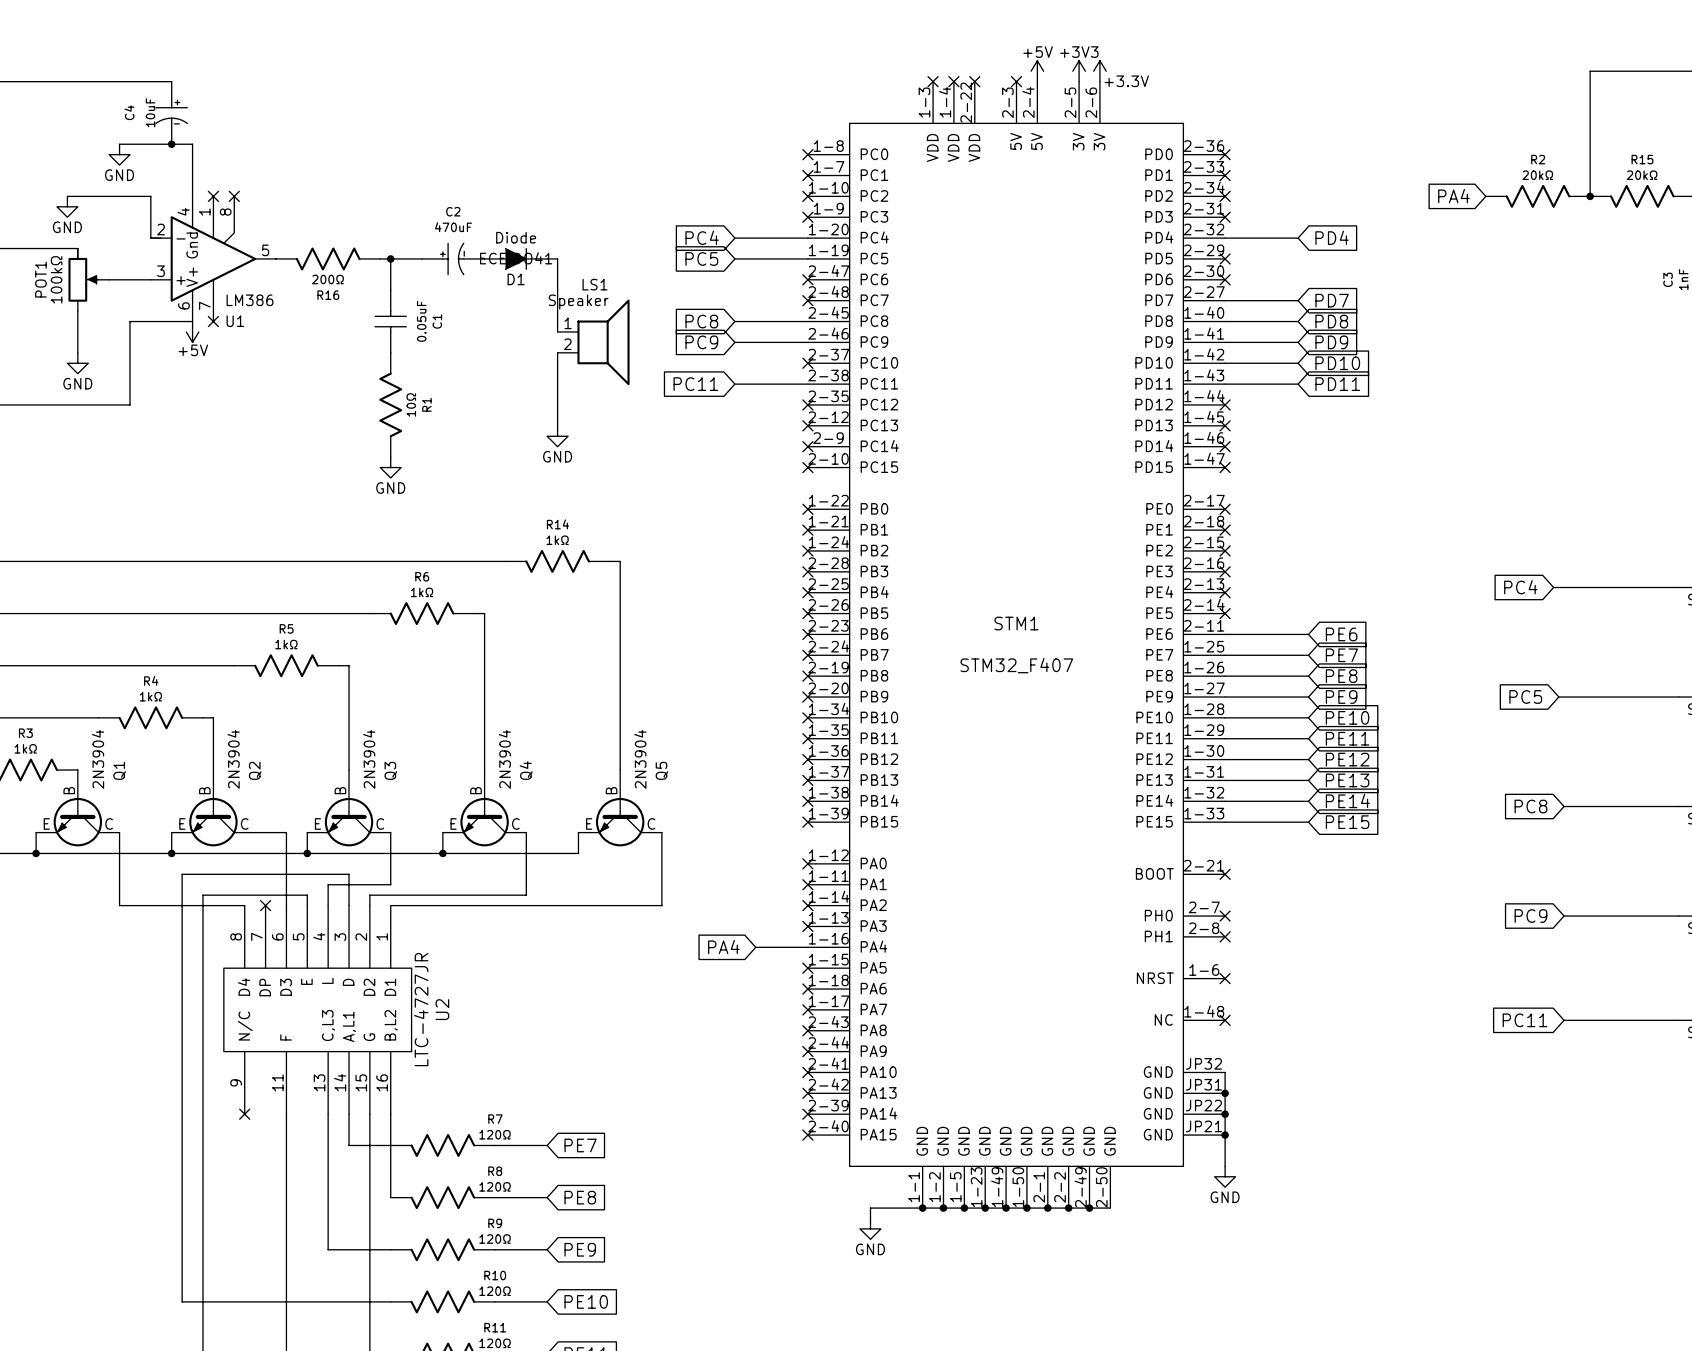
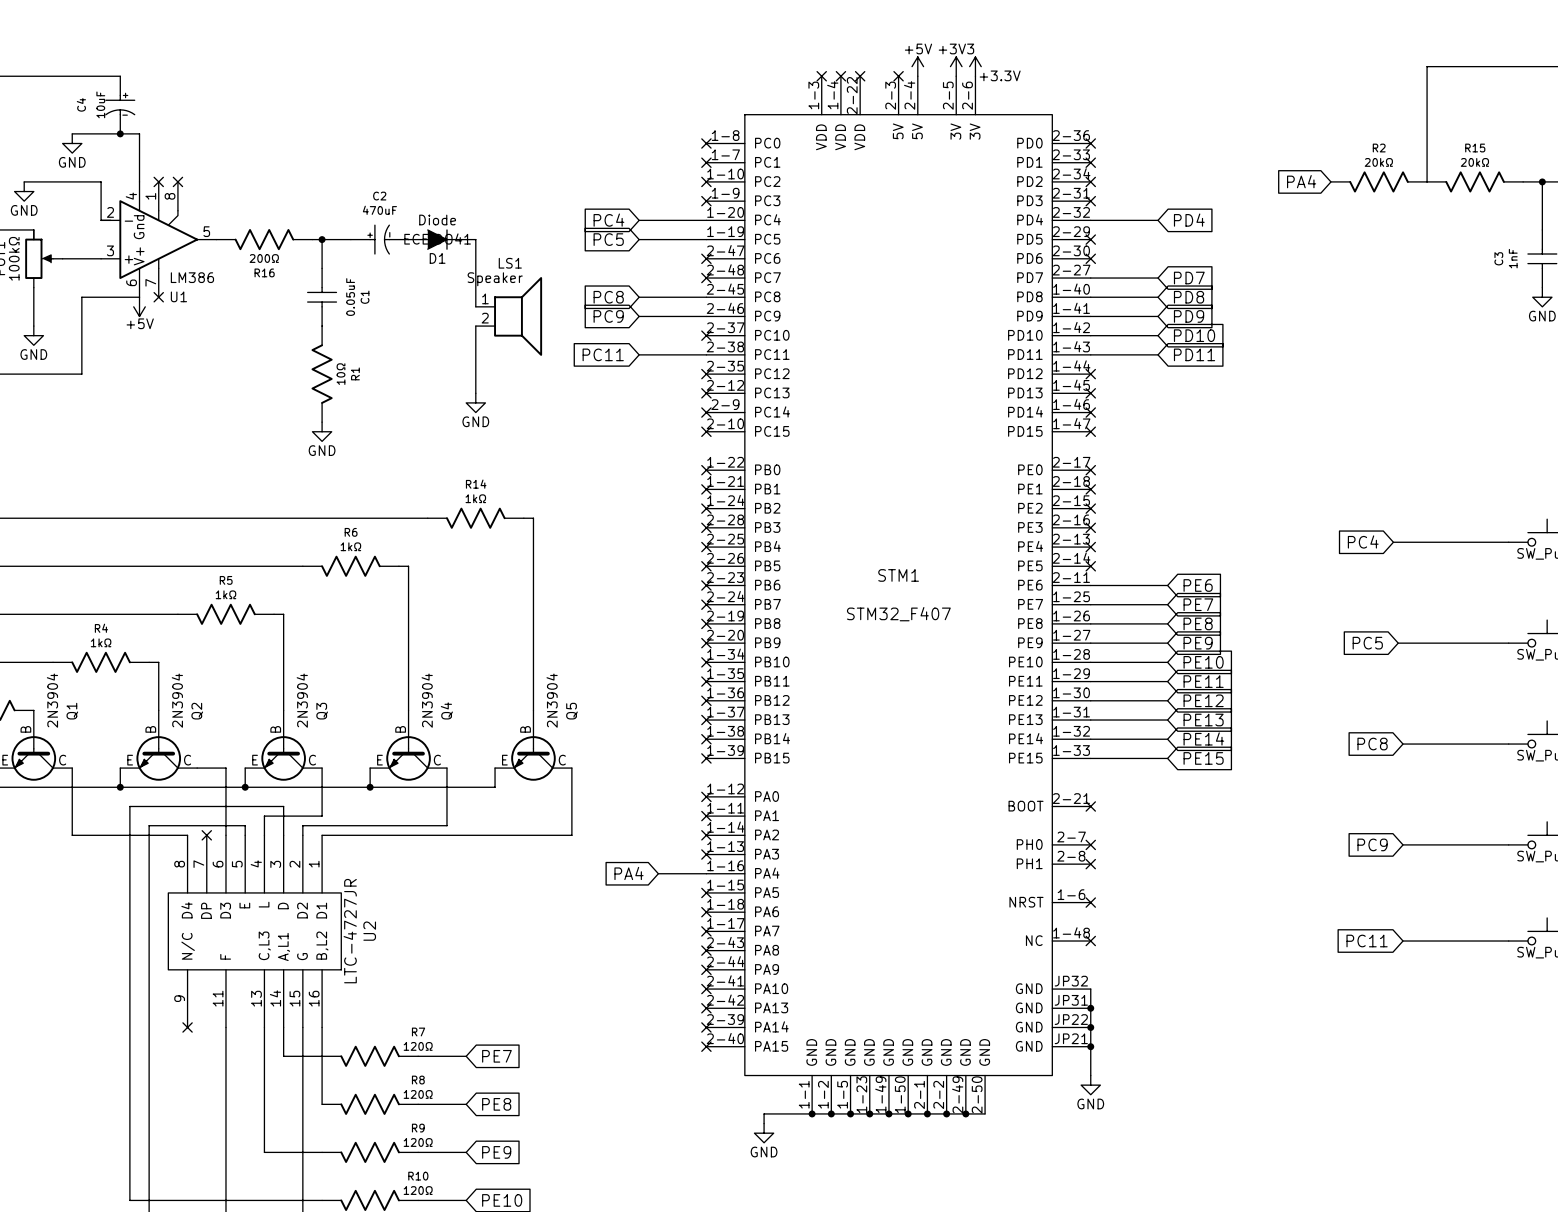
junction: (1590, 196) -> none

